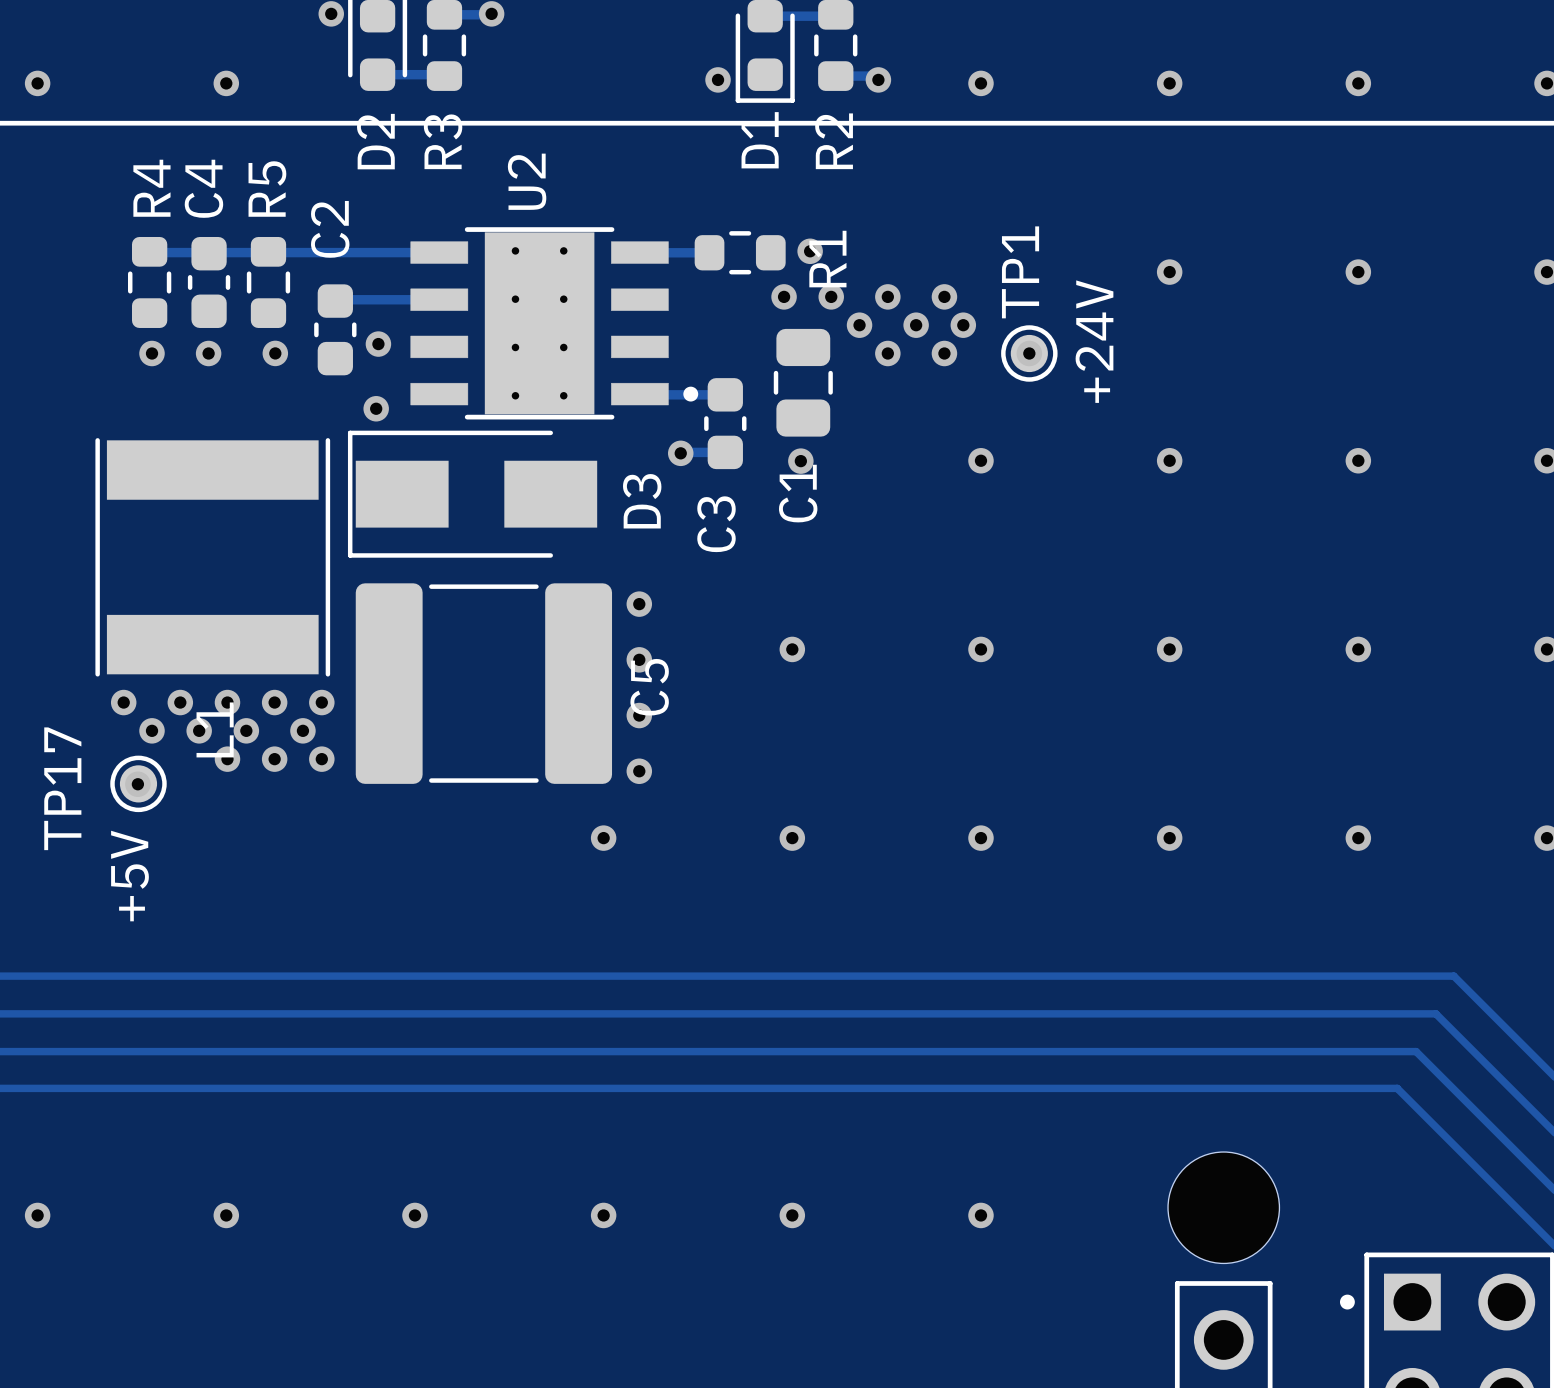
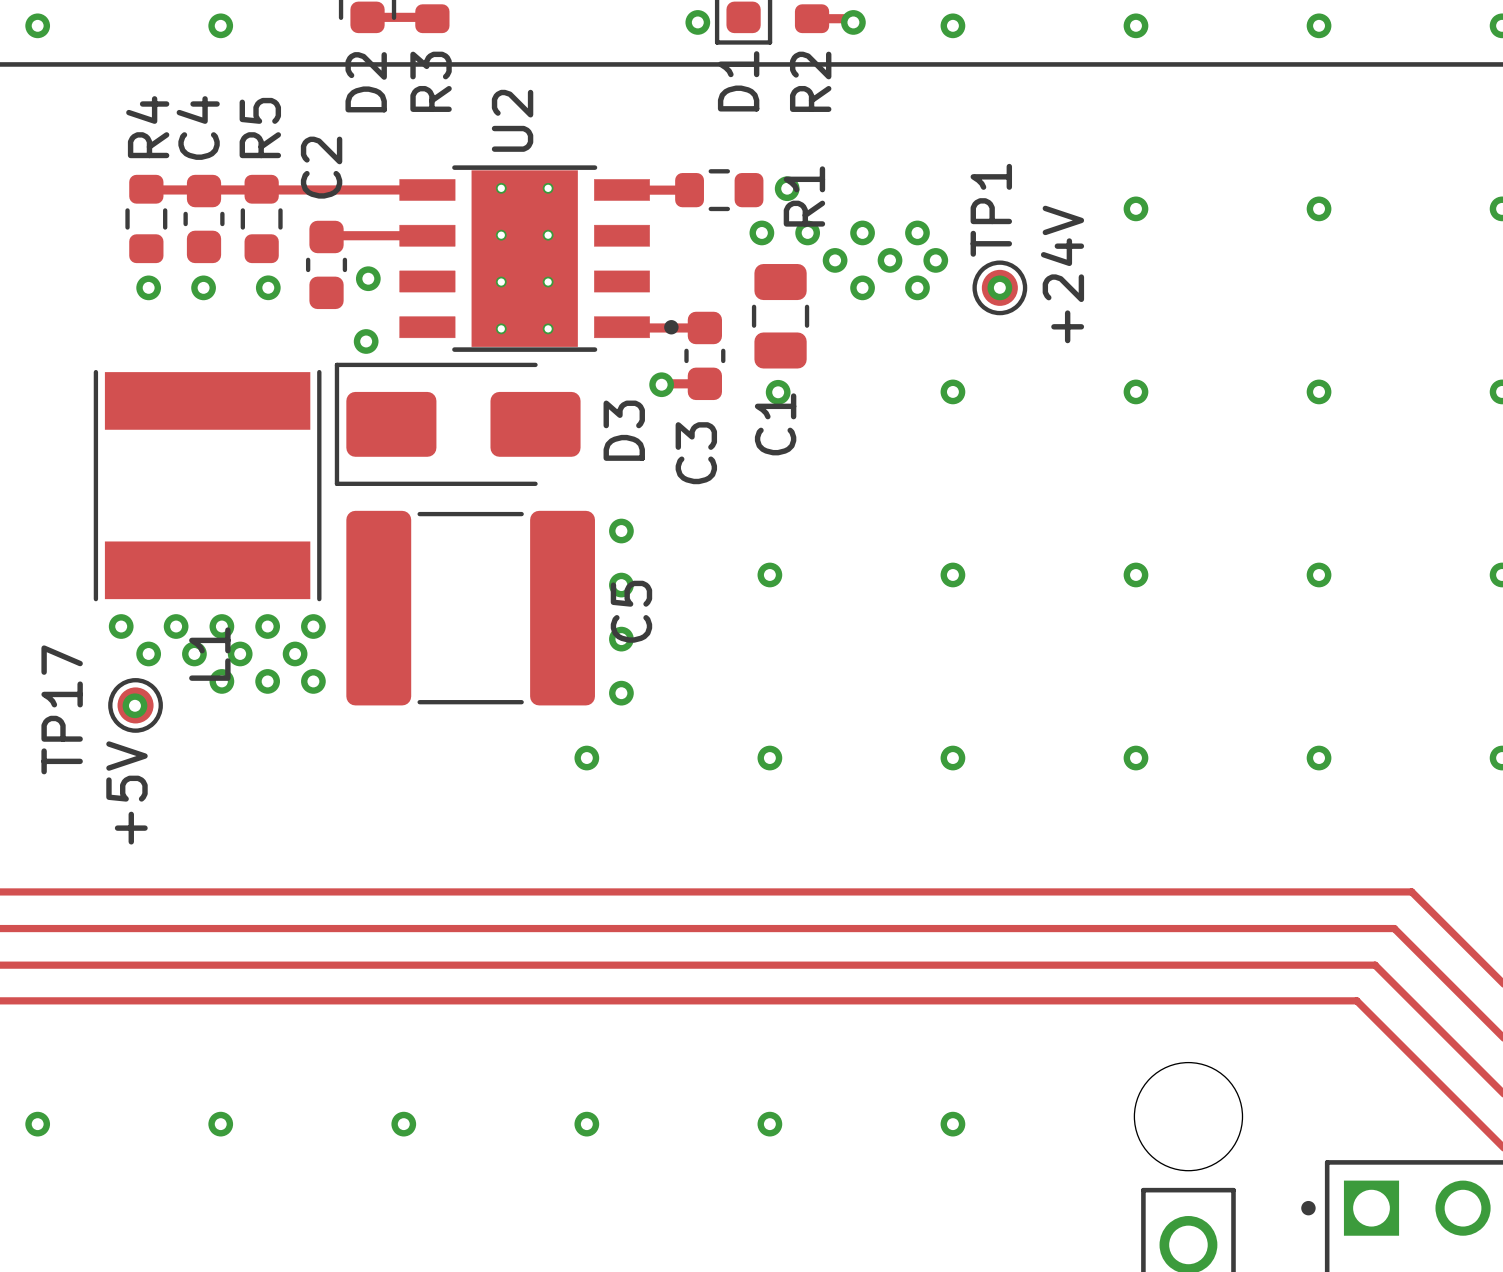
D3 footprint: [347, 430, 598, 558] -> [334, 362, 581, 486]

